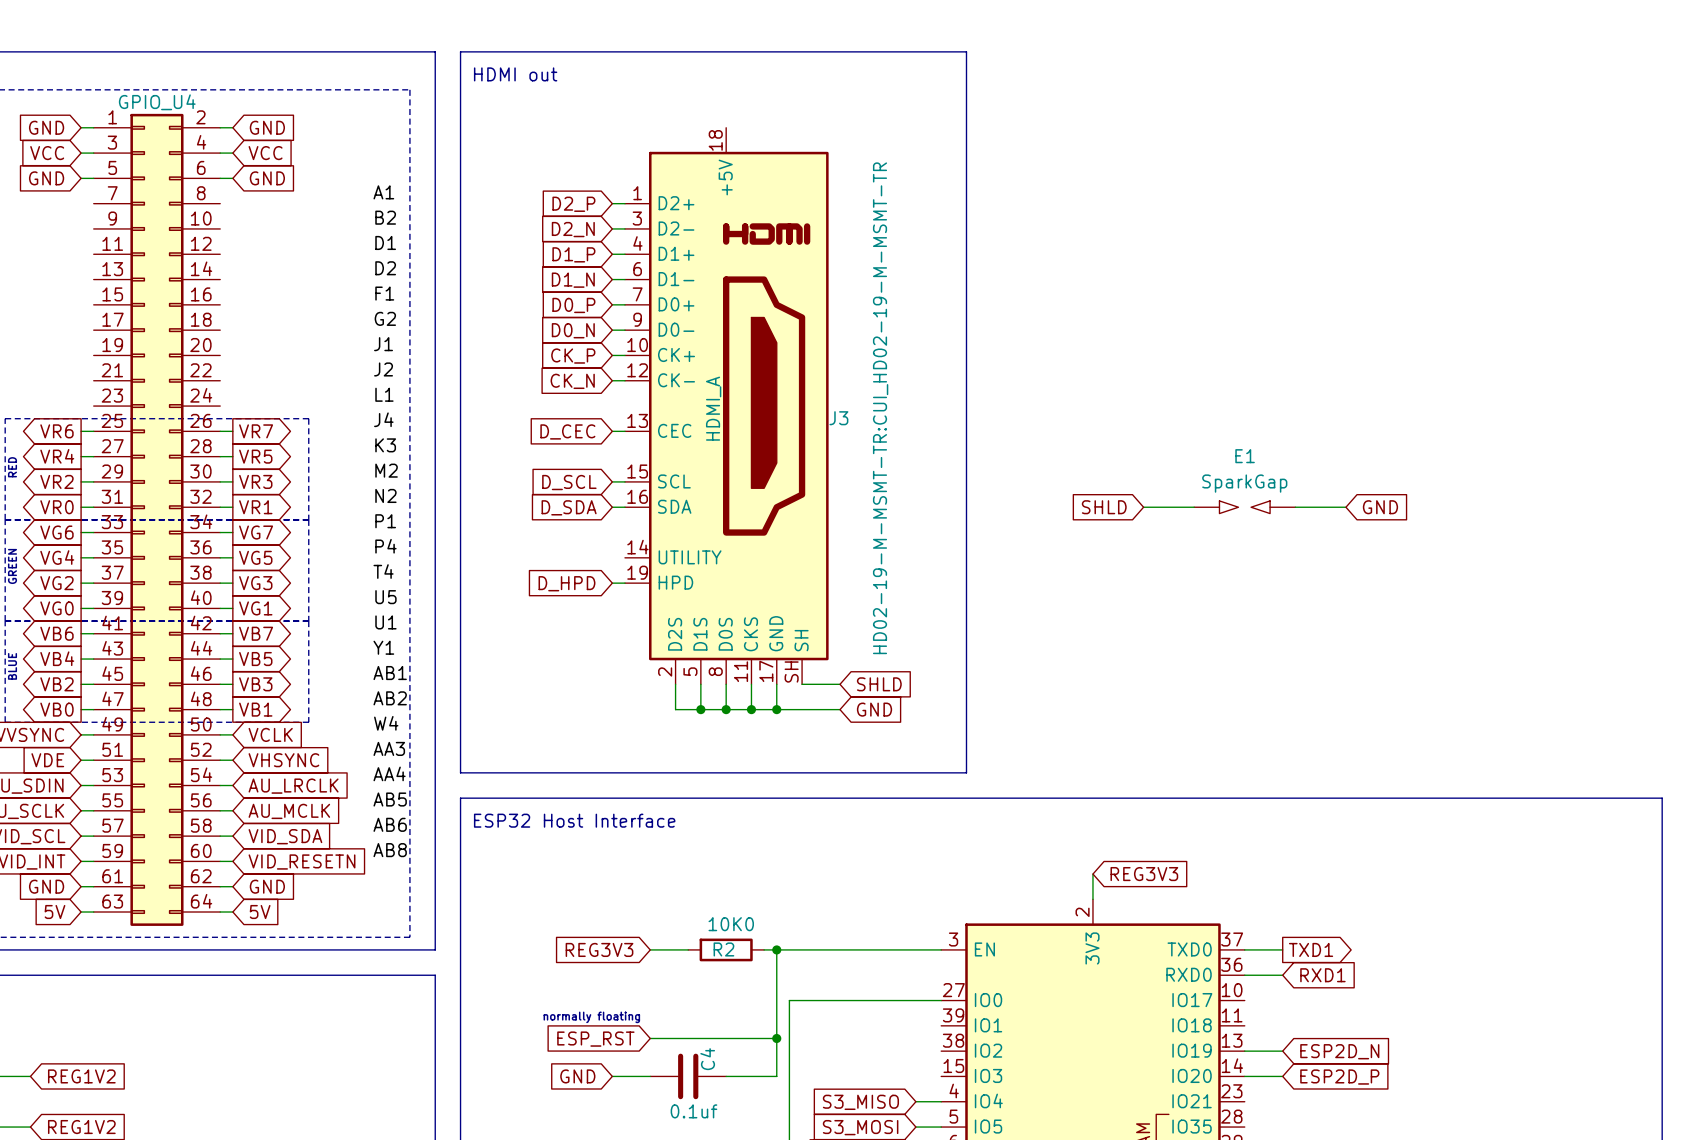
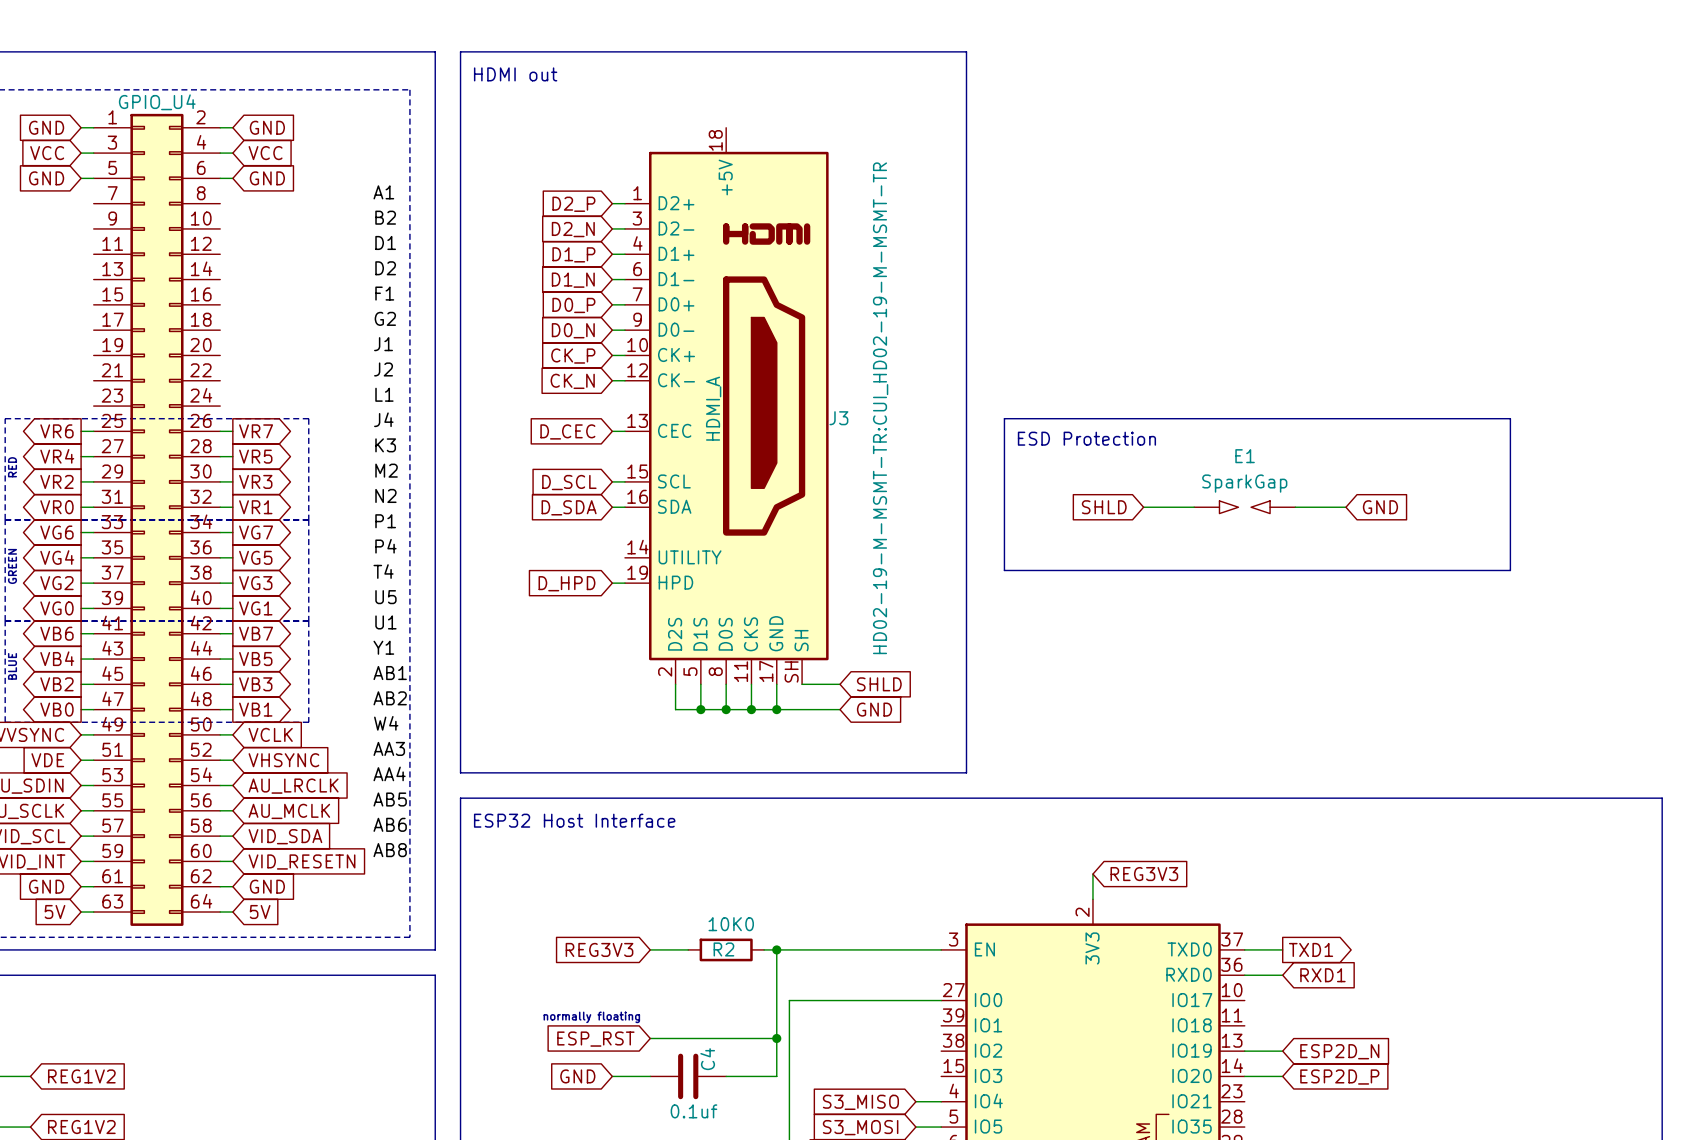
line: none -> (1004, 418) (1510, 418) (1510, 570) (1004, 570) (1004, 418)
text: none -> ESD Protection (1086, 438)

